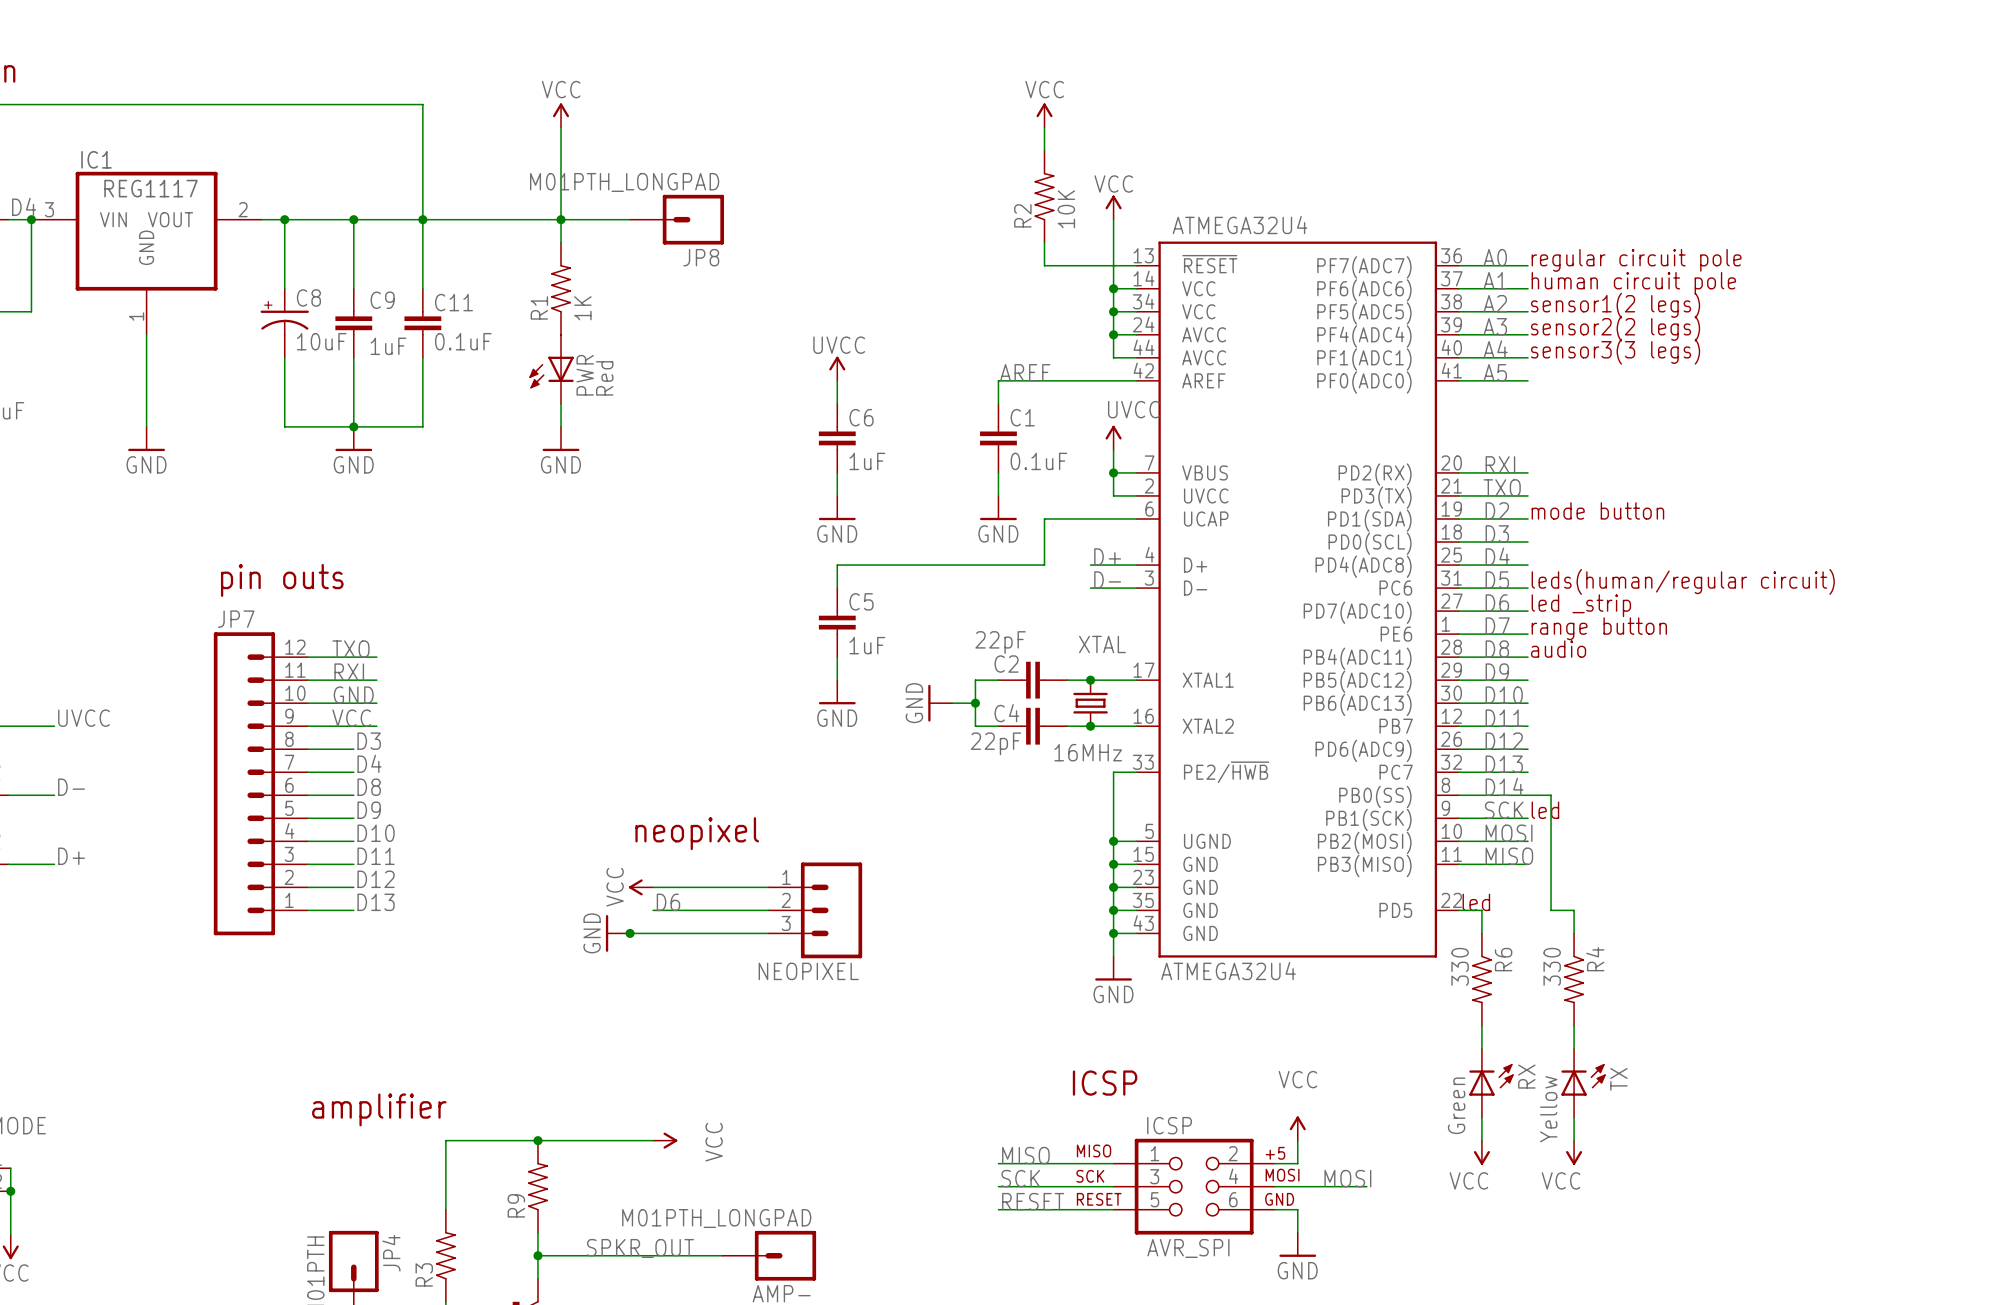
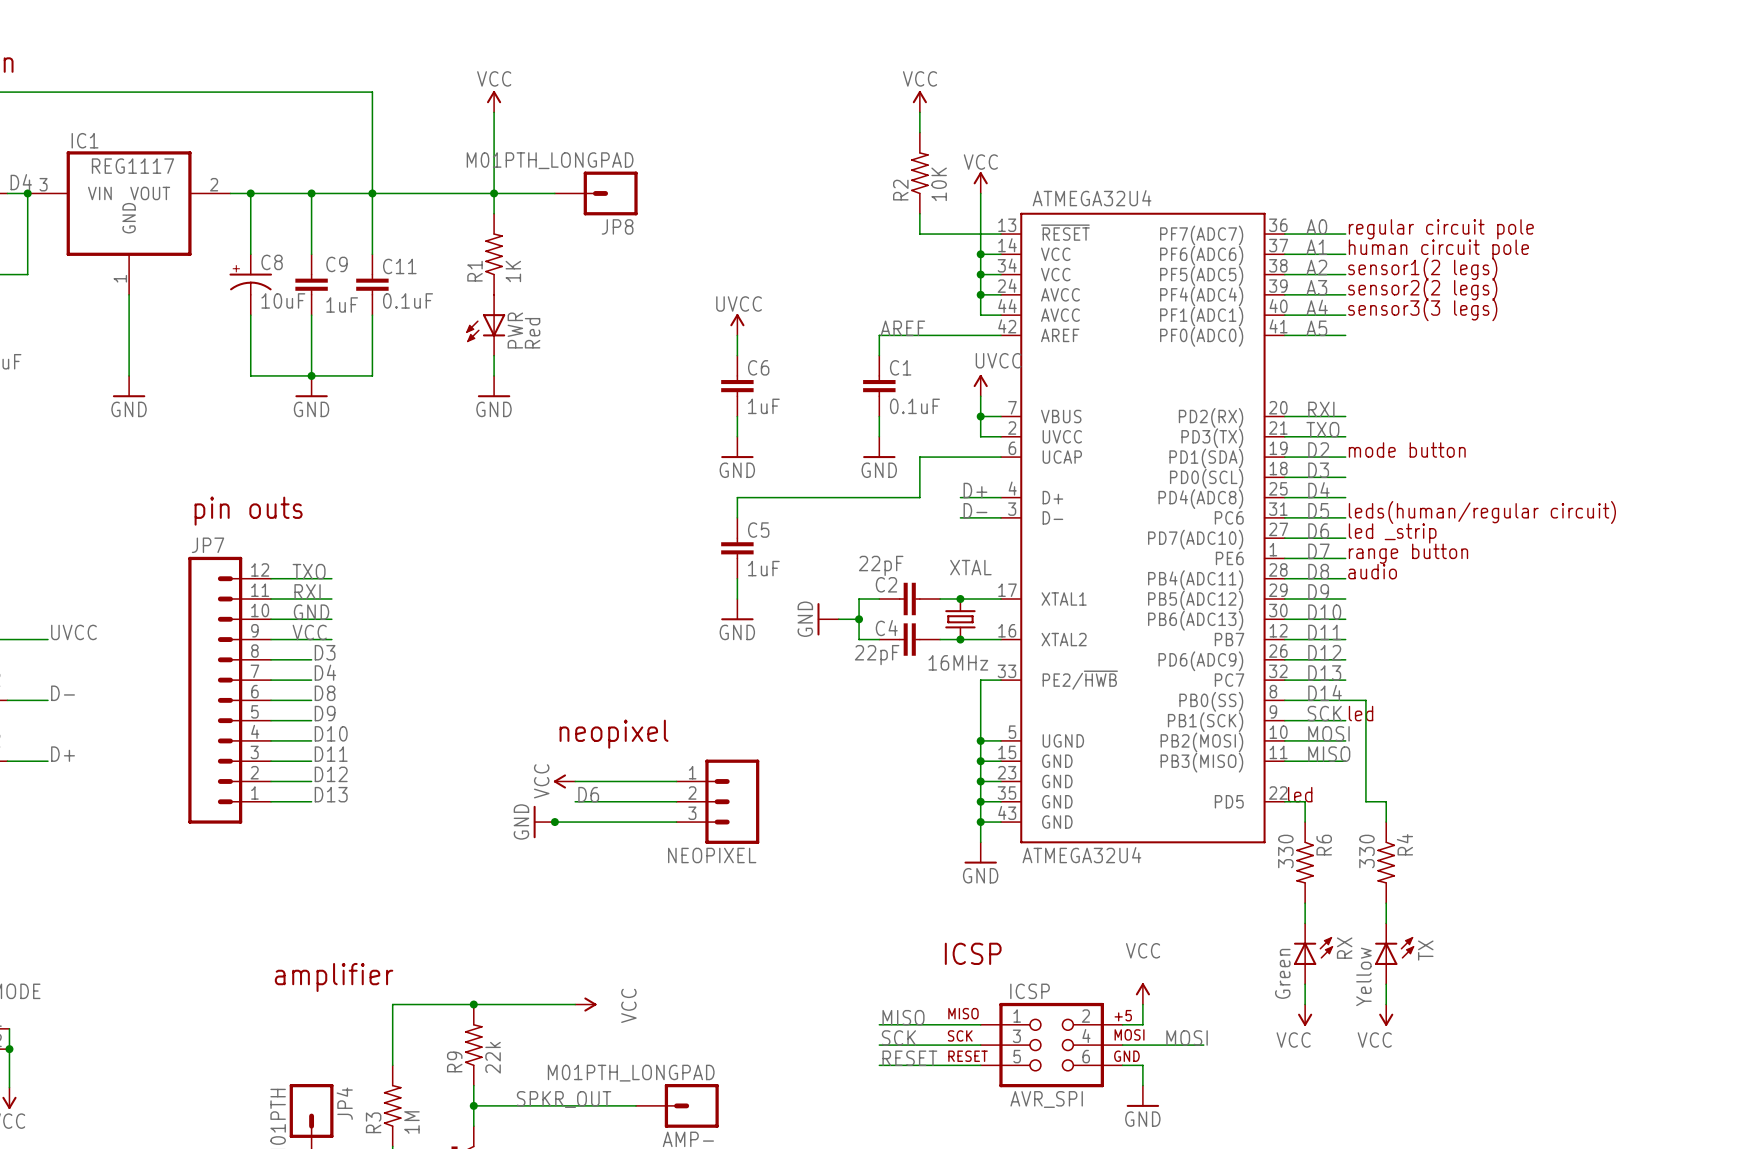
R9 value: none -> 22k (493, 1057)
R3 value: none -> 1M (411, 1122)

